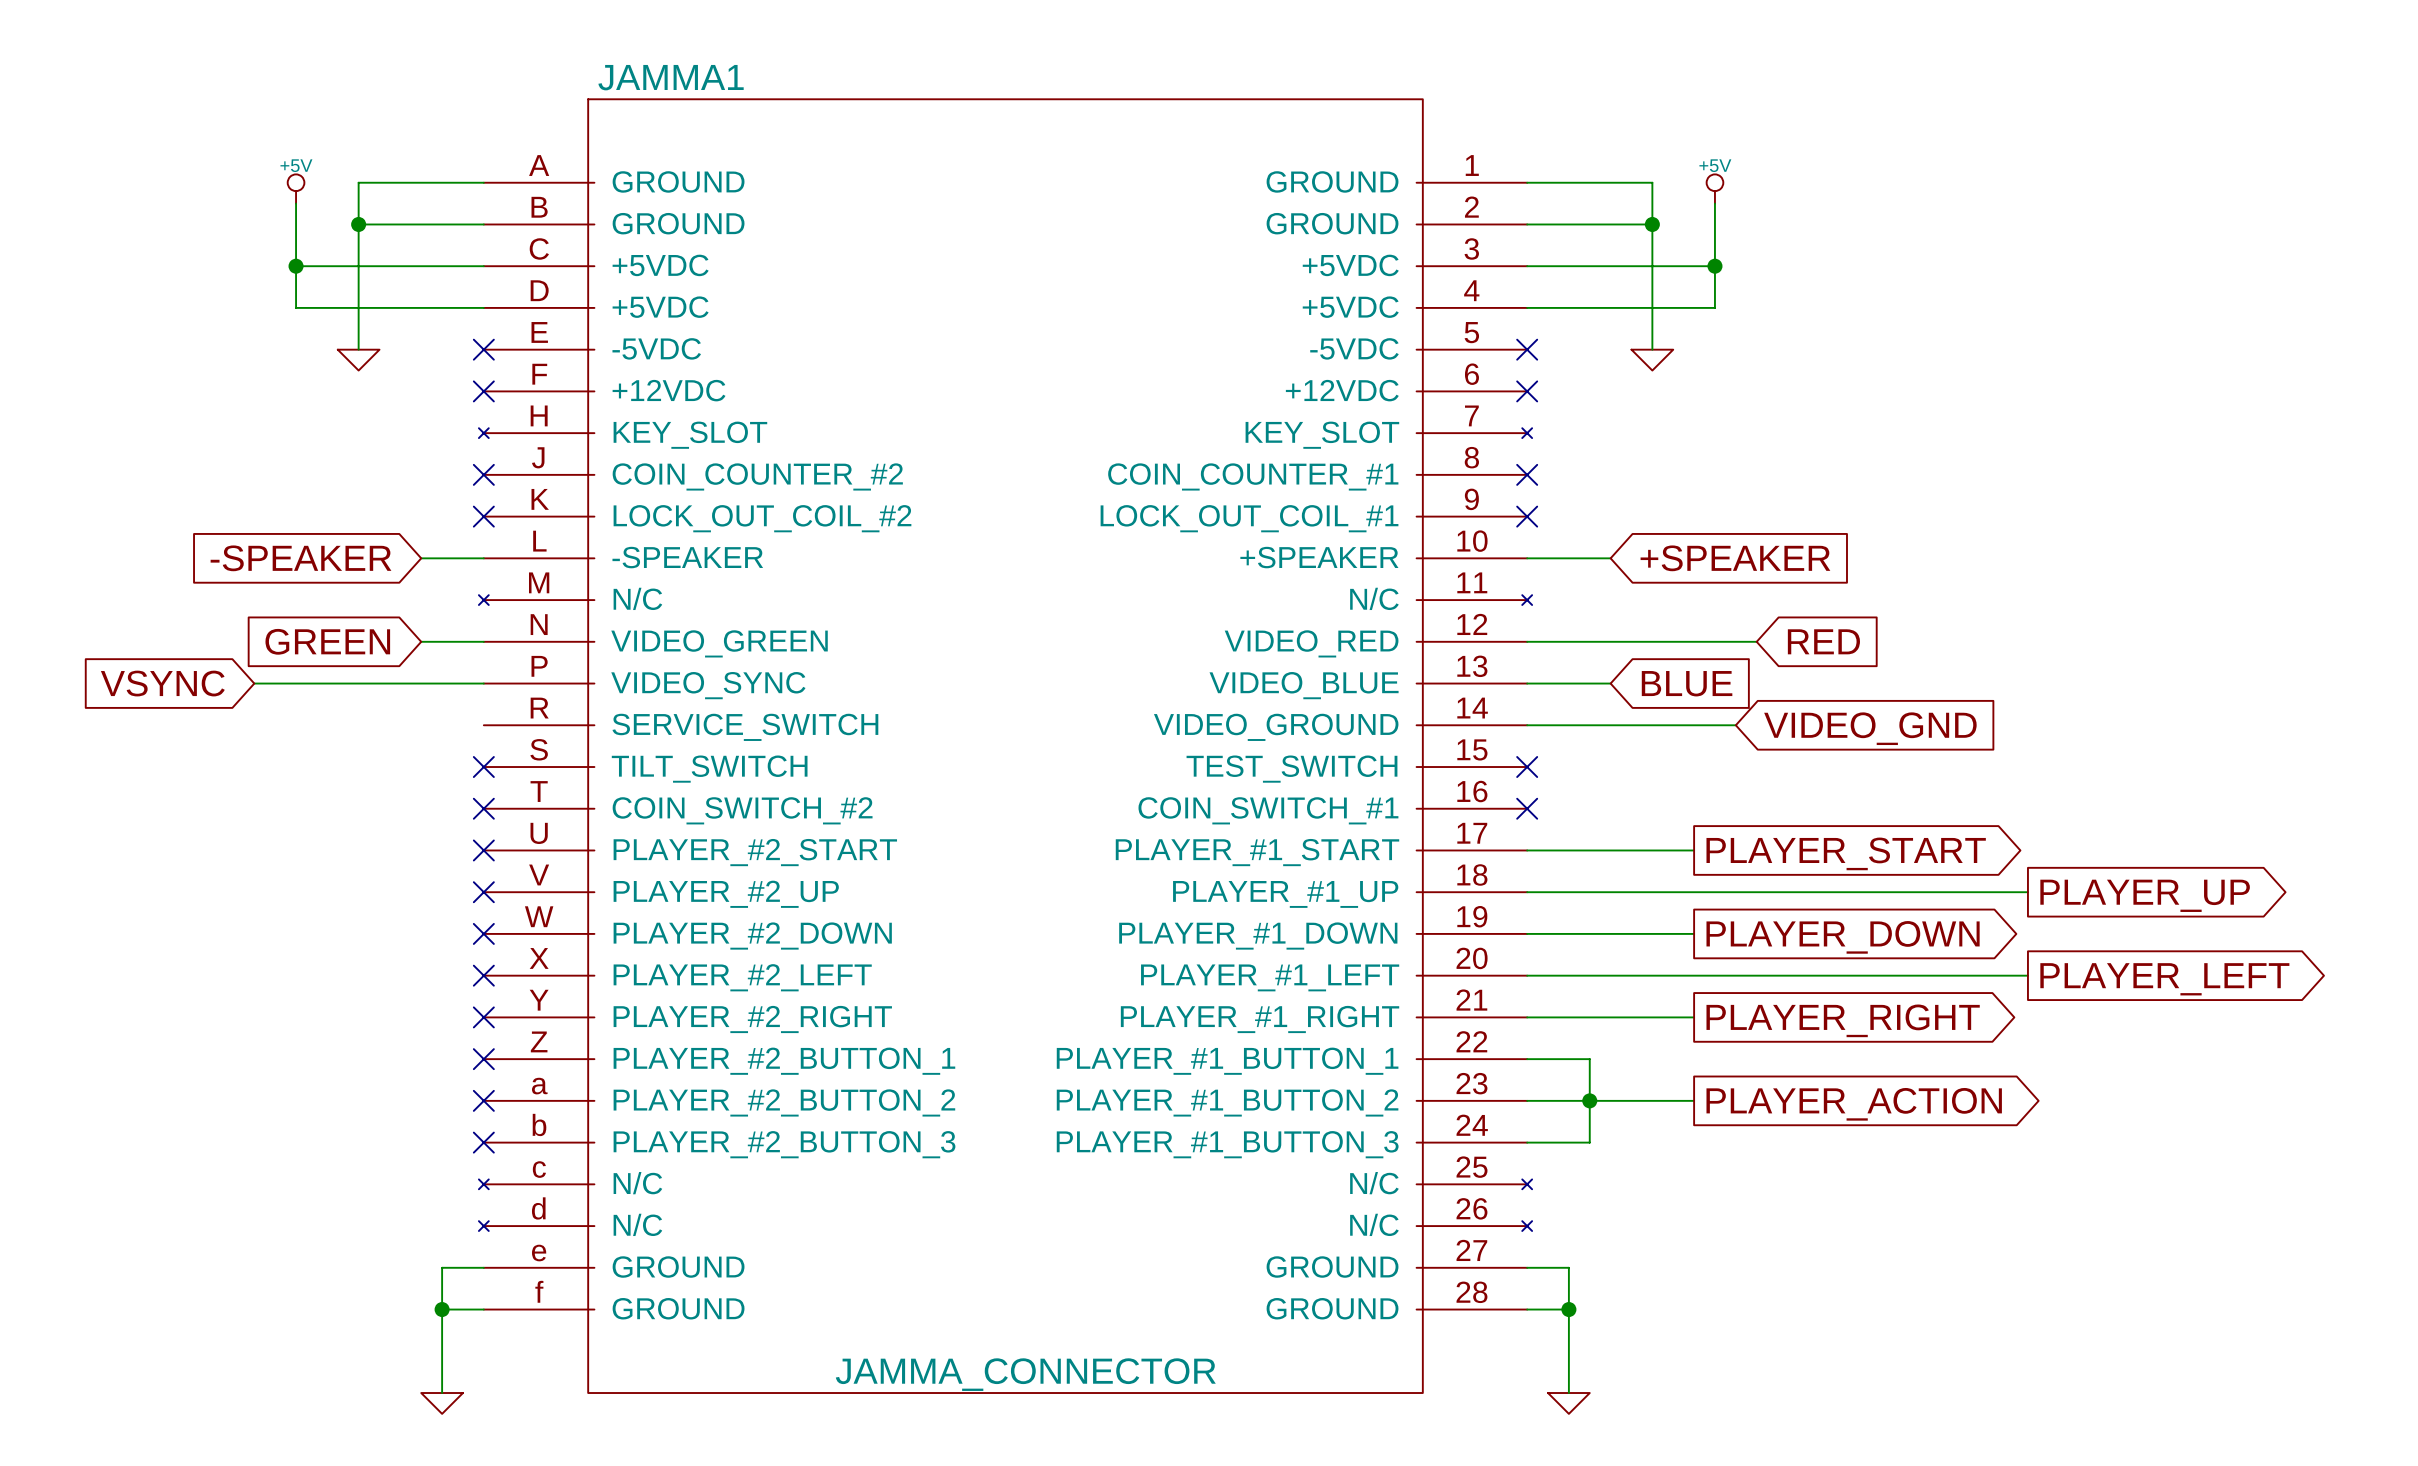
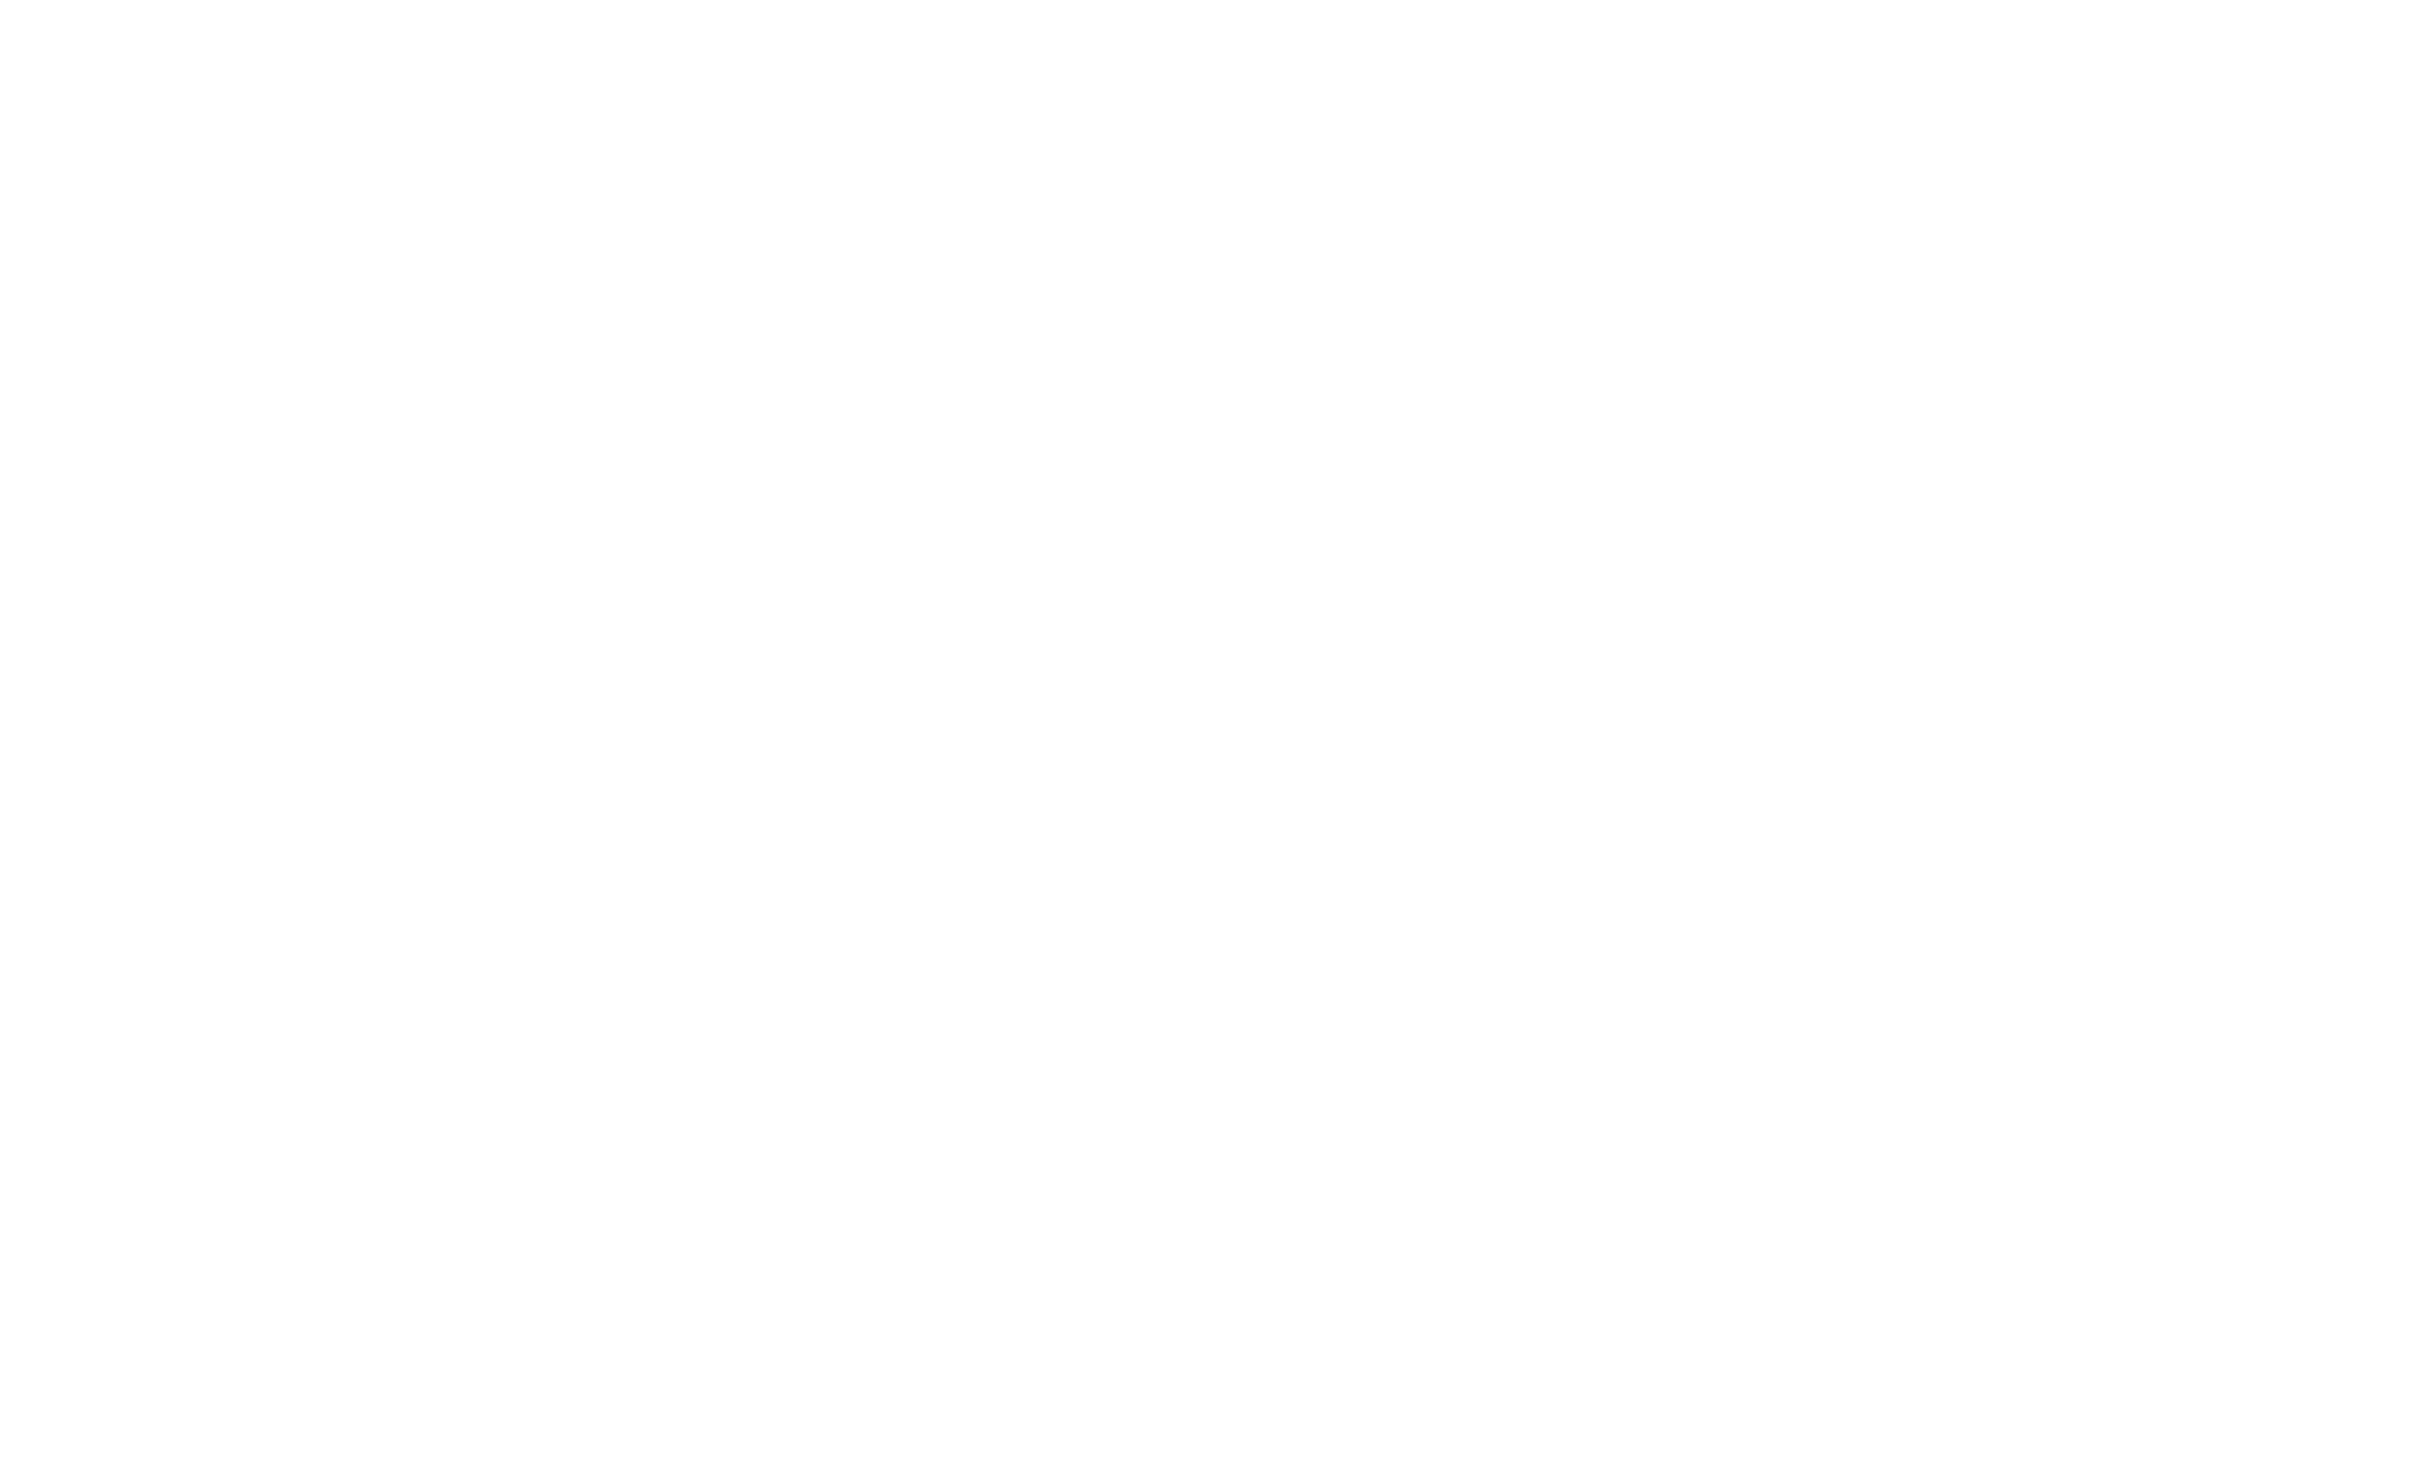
wire: (483, 182) (358, 182) (358, 349) -> none
wire: (1527, 182) (1652, 182) (1652, 349) -> none
power symbol: +5V (296, 189) -> none
power symbol: +5V (1714, 189) -> none
wire: (296, 203) (296, 307) (483, 307) -> none
wire: (1714, 203) (1714, 307) (1527, 307) -> none
wire: (358, 224) (483, 224) -> none
junction: (358, 224) -> none
wire: (1527, 224) (1652, 224) -> none
junction: (1652, 224) -> none
wire: (296, 266) (483, 266) -> none
junction: (296, 266) -> none
wire: (1527, 266) (1714, 266) -> none
junction: (1714, 266) -> none
no-connect mark: (483, 349) -> none
no-connect mark: (1527, 349) -> none
power symbol: (358, 360) -> none
power symbol: (1652, 360) -> none
no-connect mark: (483, 391) -> none
no-connect mark: (1527, 391) -> none
no-connect mark: (483, 474) -> none
no-connect mark: (1527, 474) -> none
no-connect mark: (483, 516) -> none
no-connect mark: (1527, 516) -> none
global label: -SPEAKER (301, 558) -> none
wire: (421, 558) (483, 558) -> none
wire: (1527, 558) (1610, 558) -> none
global label: +SPEAKER (1735, 558) -> none
global label: GREEN (327, 641) -> none
wire: (421, 641) (483, 641) -> none
wire: (1527, 641) (1756, 641) -> none
global label: RED (1823, 641) -> none
global label: VSYNC (162, 683) -> none
wire: (254, 683) (483, 683) -> none
wire: (1527, 683) (1610, 683) -> none
global label: BLUE (1687, 683) -> none
wire: (1527, 725) (1735, 725) -> none
global label: VIDEO_GND (1870, 728) -> none
JAMMA1: JAMMA_CONNECTOR (1005, 746) -> none
no-connect mark: (483, 767) -> none
no-connect mark: (1527, 767) -> none
no-connect mark: (483, 808) -> none
no-connect mark: (1527, 808) -> none
no-connect mark: (483, 850) -> none
wire: (1527, 850) (1694, 850) -> none
global label: PLAYER_START (1846, 853) -> none
no-connect mark: (483, 892) -> none
wire: (1527, 892) (2027, 892) -> none
global label: PLAYER_UP (2145, 895) -> none
no-connect mark: (483, 933) -> none
wire: (1527, 933) (1694, 933) -> none
global label: PLAYER_DOWN (1843, 937) -> none
no-connect mark: (483, 975) -> none
wire: (1527, 975) (2027, 975) -> none
global label: PLAYER_LEFT (2164, 979) -> none
no-connect mark: (483, 1017) -> none
wire: (1527, 1017) (1694, 1017) -> none
global label: PLAYER_RIGHT (1843, 1020) -> none
no-connect mark: (483, 1059) -> none
wire: (1527, 1059) (1589, 1059) (1589, 1142) (1527, 1142) -> none
no-connect mark: (483, 1100) -> none
wire: (1527, 1100) (1694, 1100) -> none
junction: (1589, 1100) -> none
global label: PLAYER_ACTION (1854, 1104) -> none
no-connect mark: (483, 1142) -> none
wire: (483, 1267) (442, 1267) (442, 1393) -> none
wire: (1527, 1267) (1568, 1267) (1568, 1393) -> none
wire: (442, 1309) (483, 1309) -> none
junction: (442, 1309) -> none
wire: (1527, 1309) (1568, 1309) -> none
junction: (1568, 1309) -> none
power symbol: (442, 1403) -> none
power symbol: (1568, 1403) -> none

